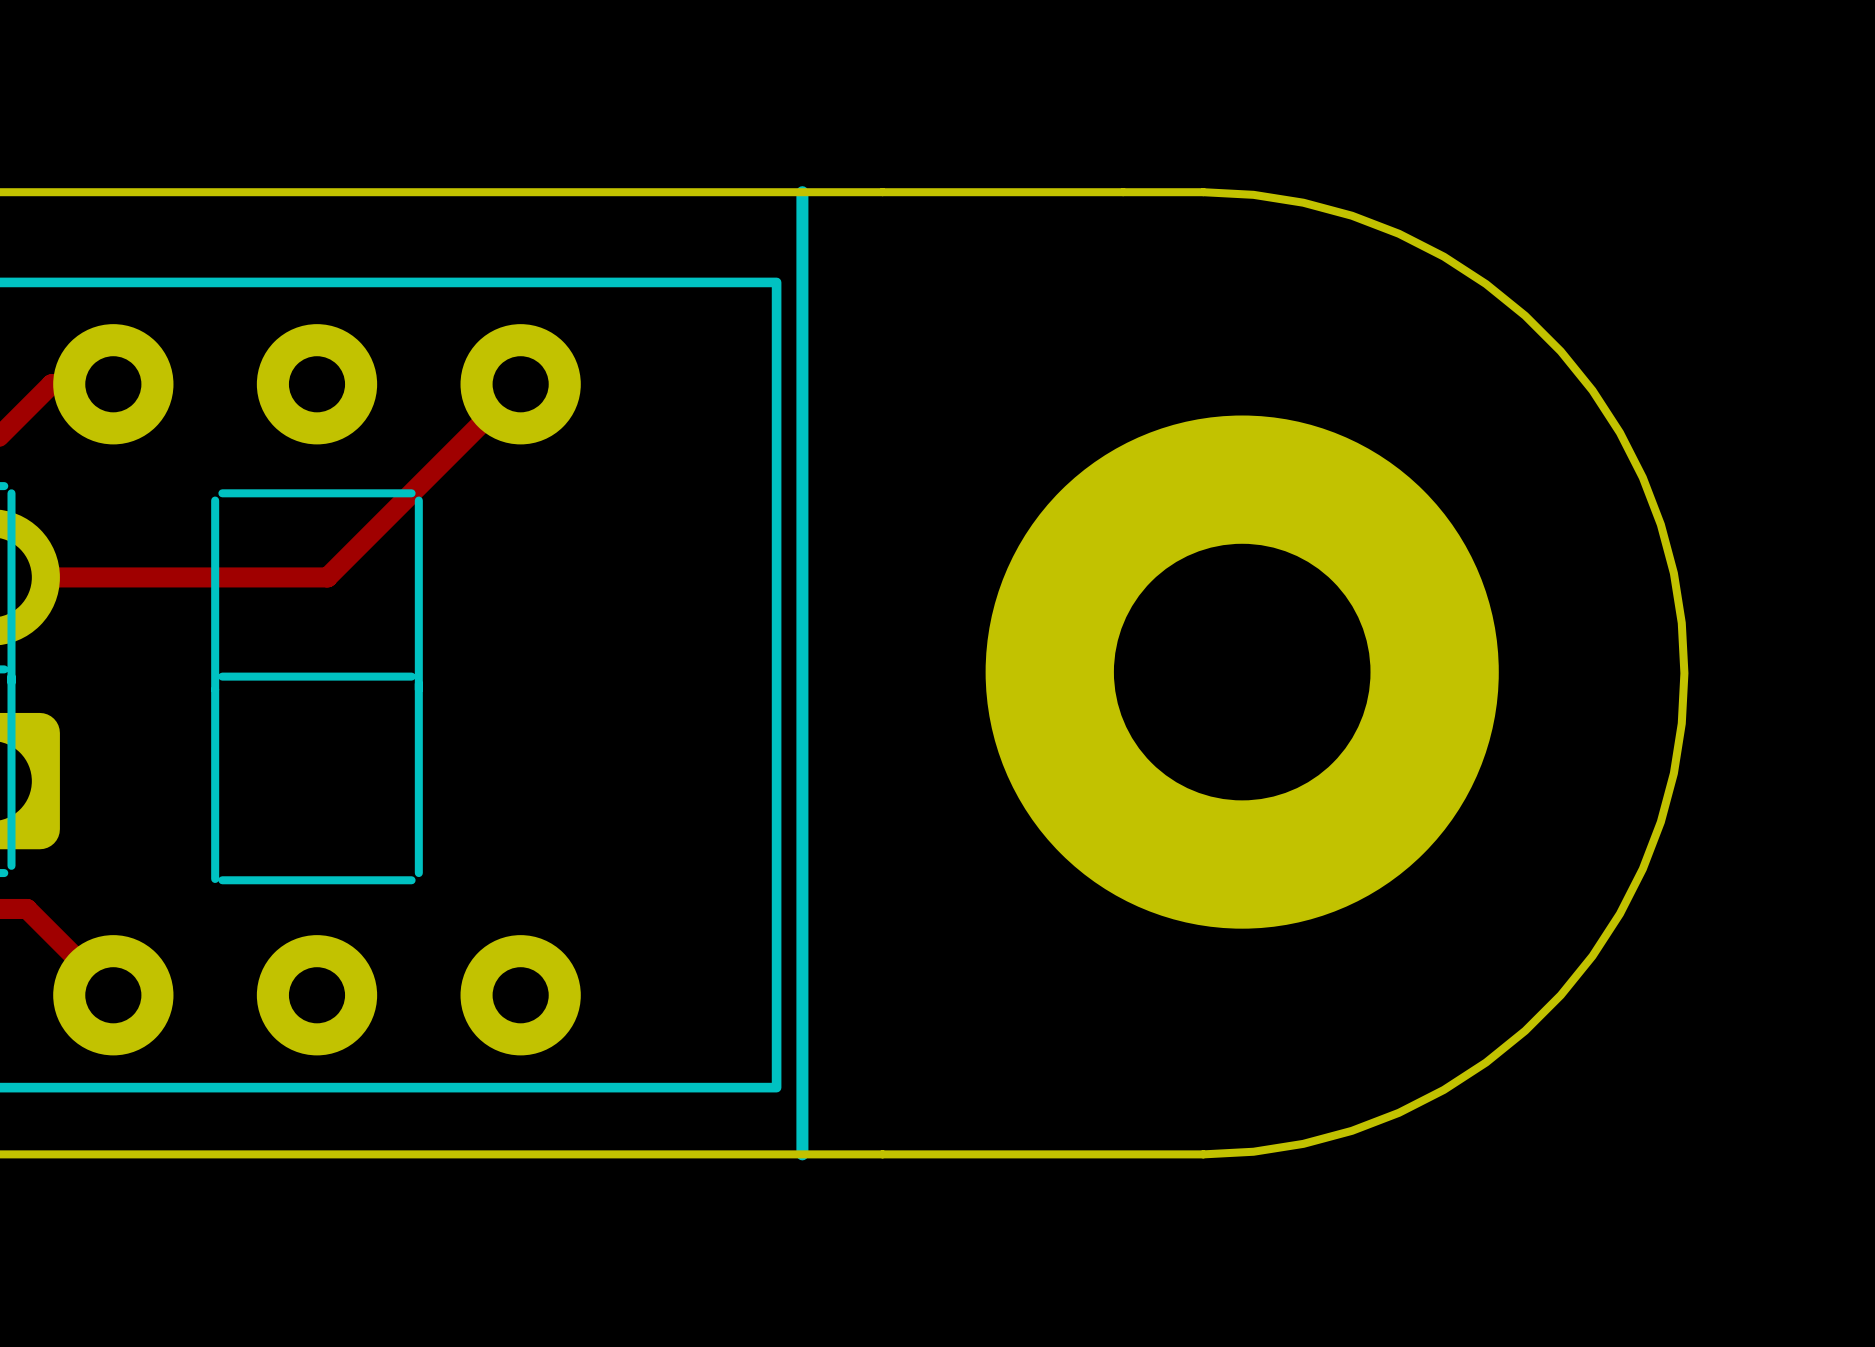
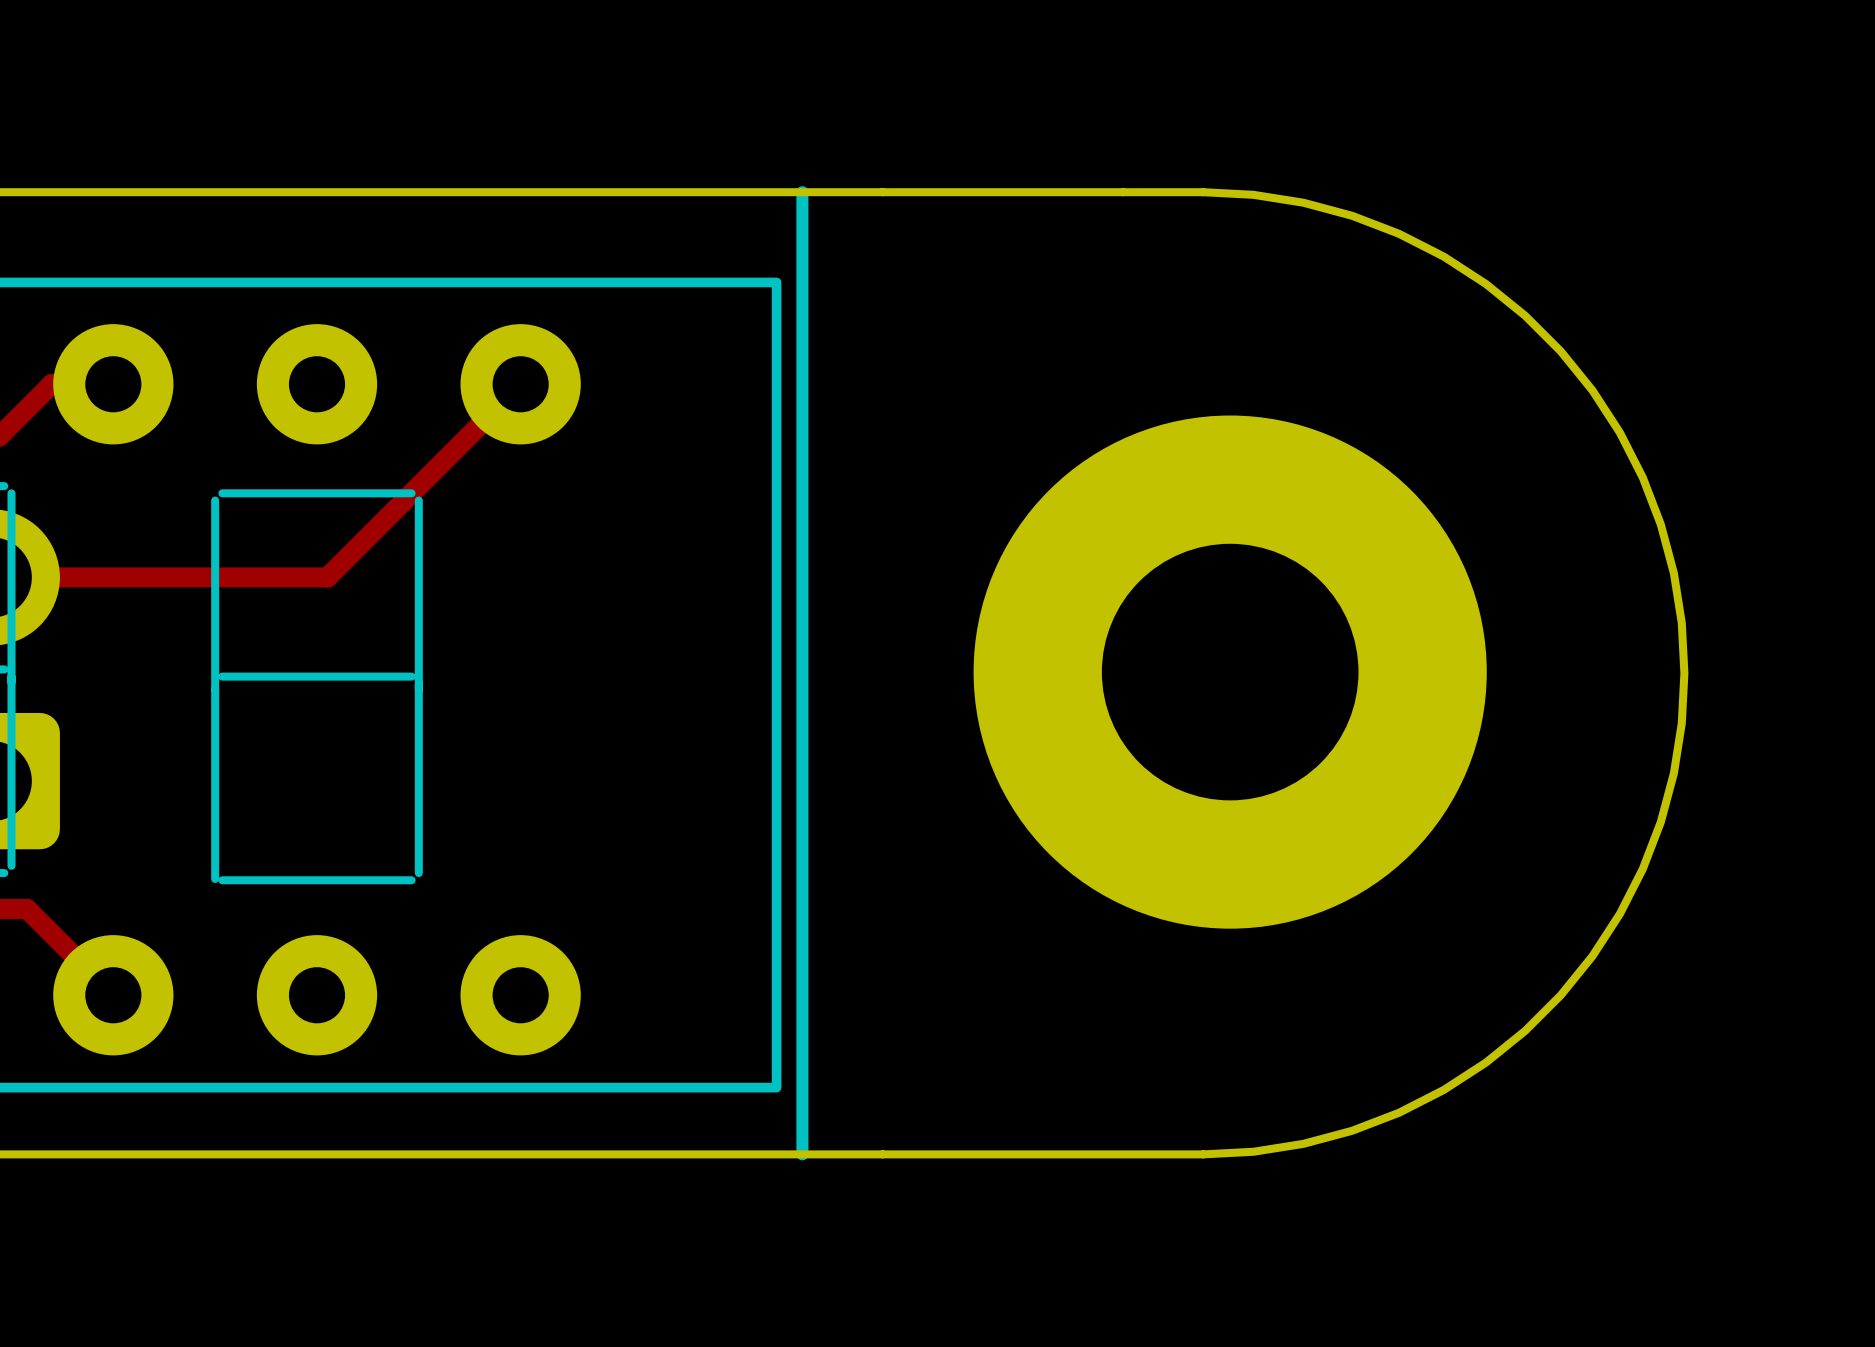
part position: (1242, 672) -> (1230, 672)

